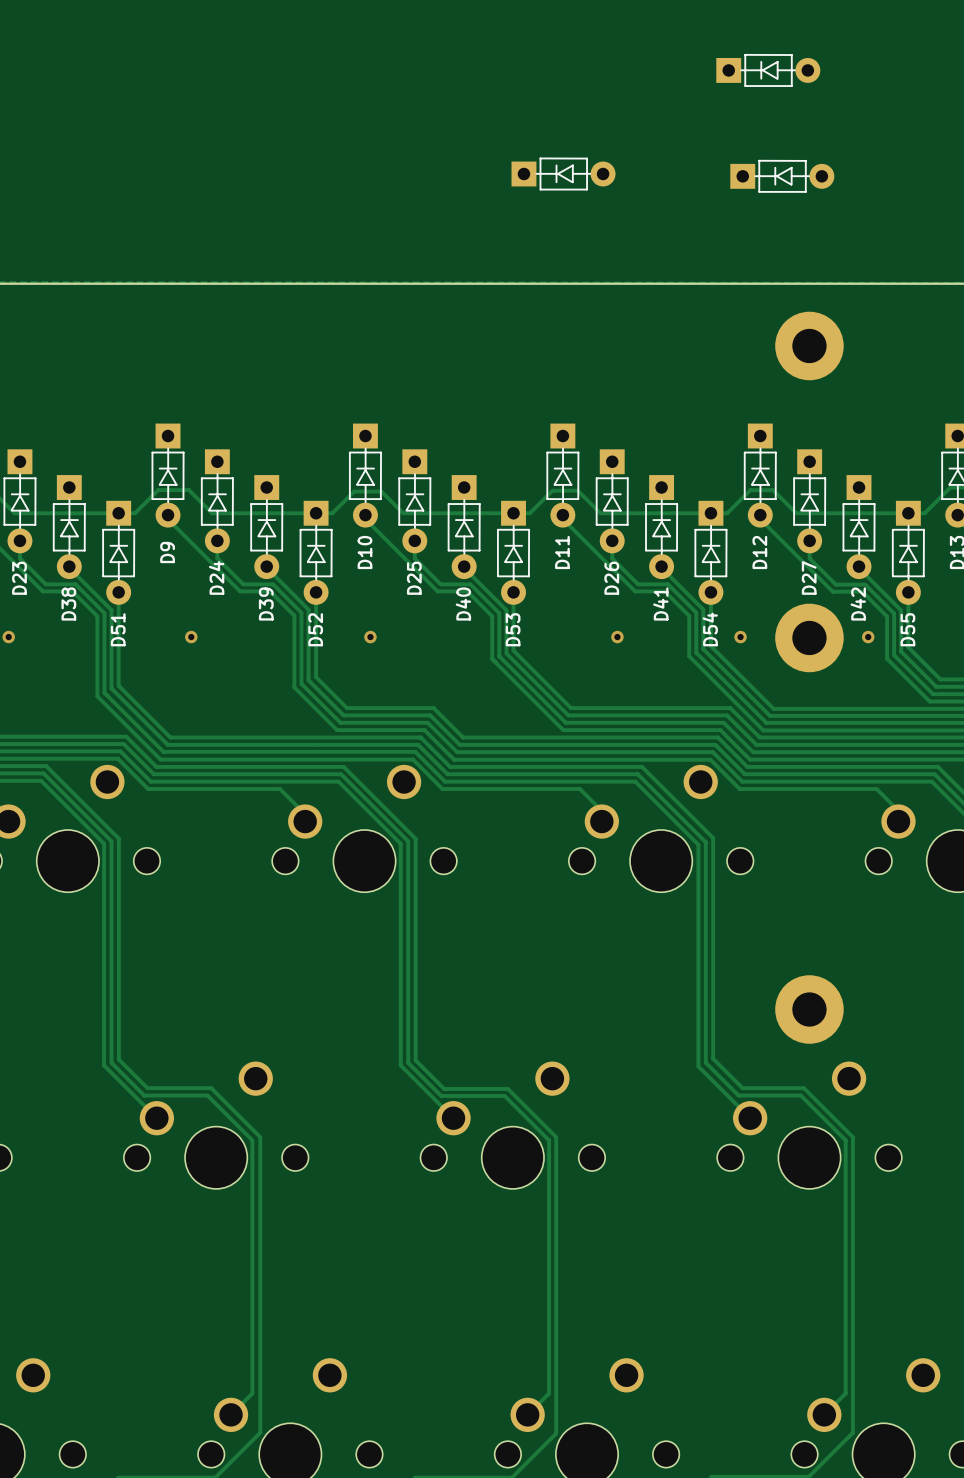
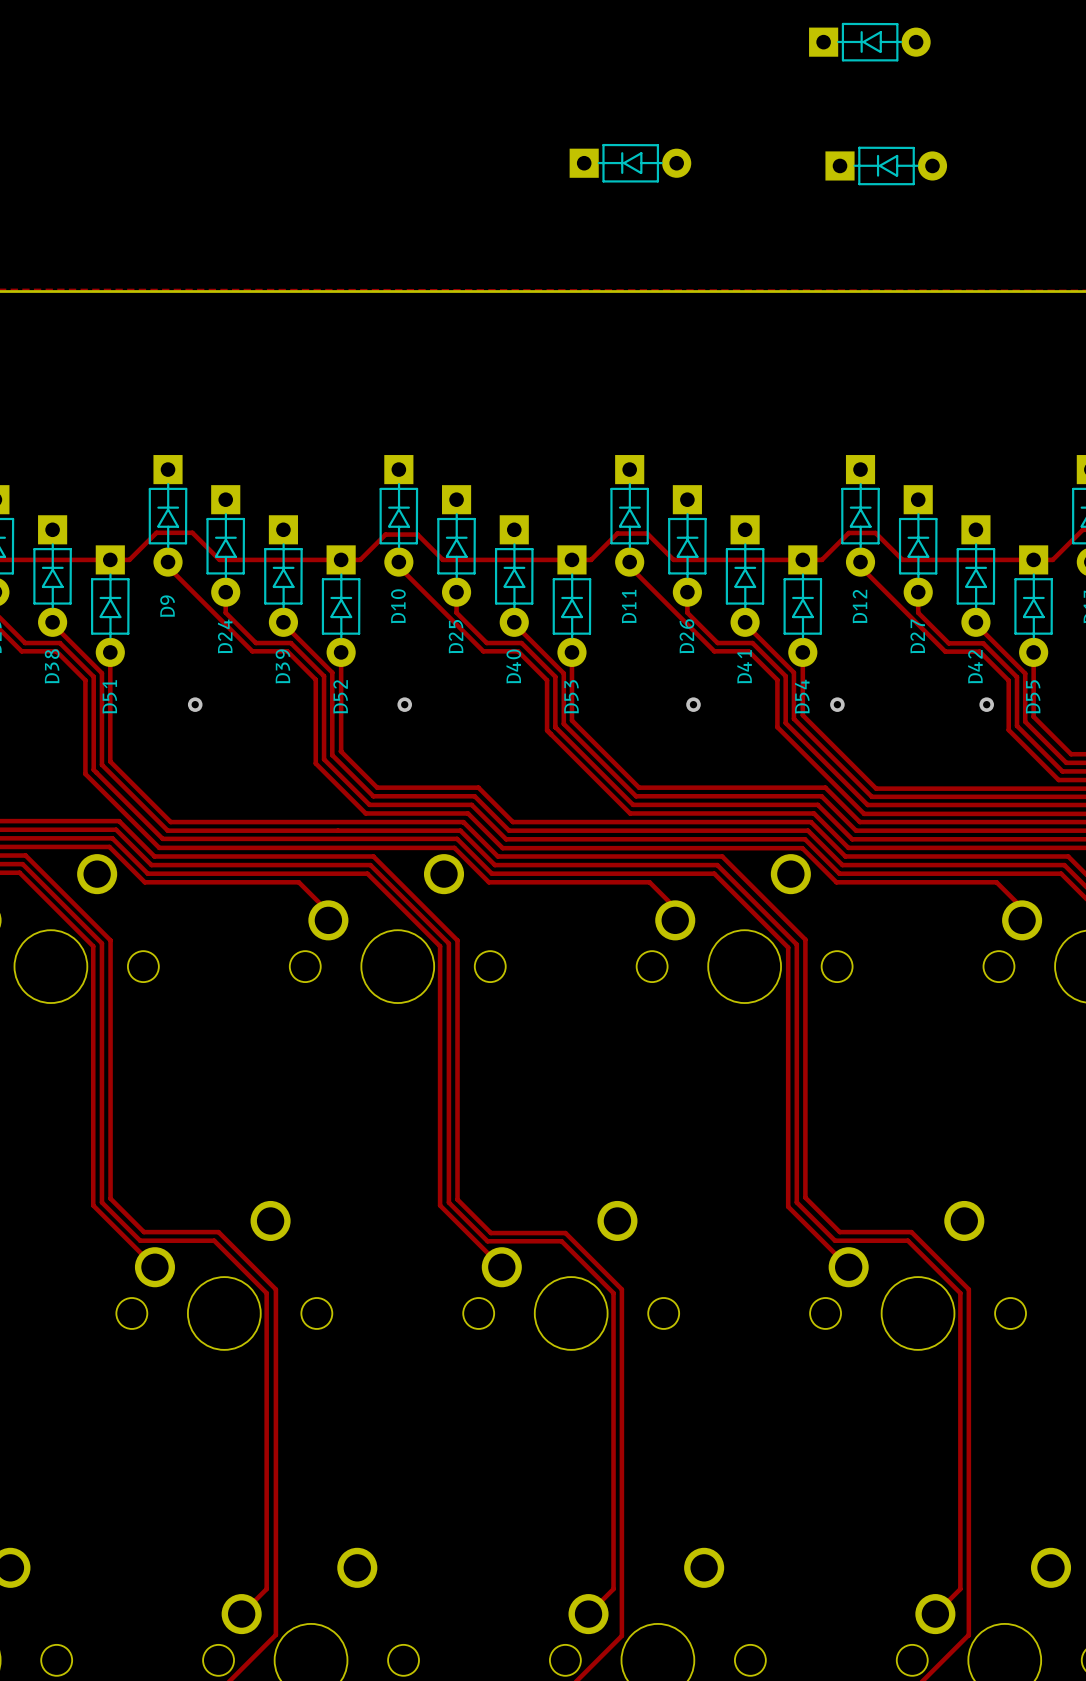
part: (809, 345) -> none
part: (809, 637) -> none
part: (809, 1009) -> none

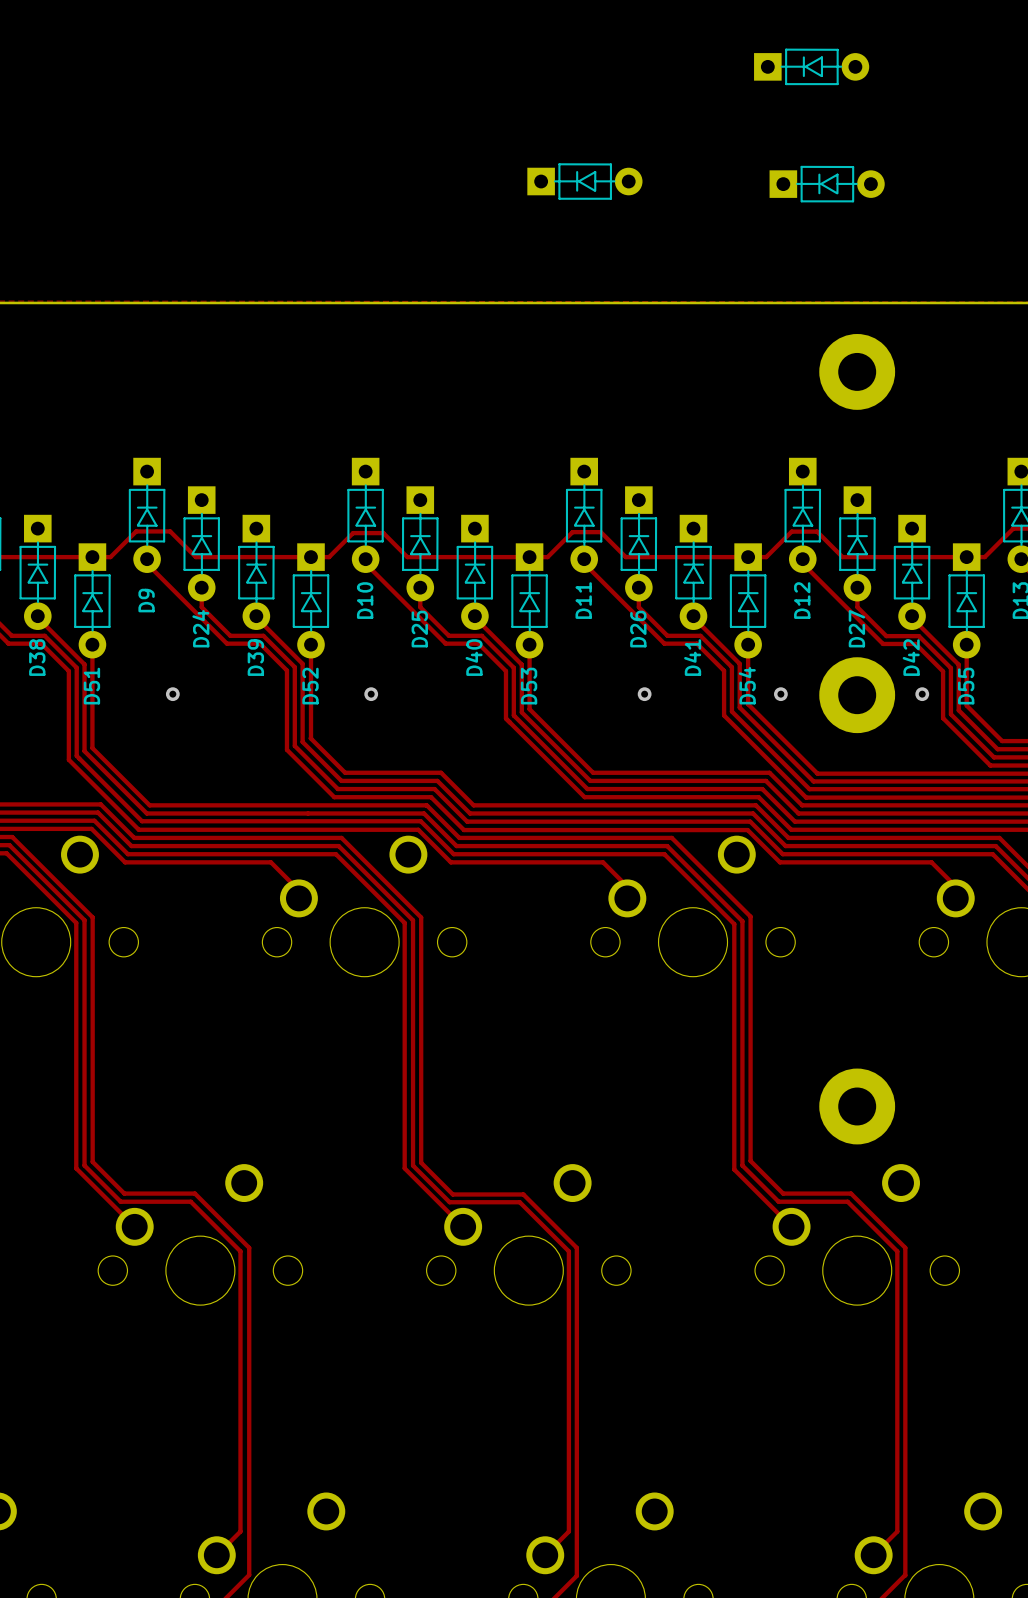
part: none -> (857, 371)
part: none -> (857, 695)
part: none -> (857, 1106)

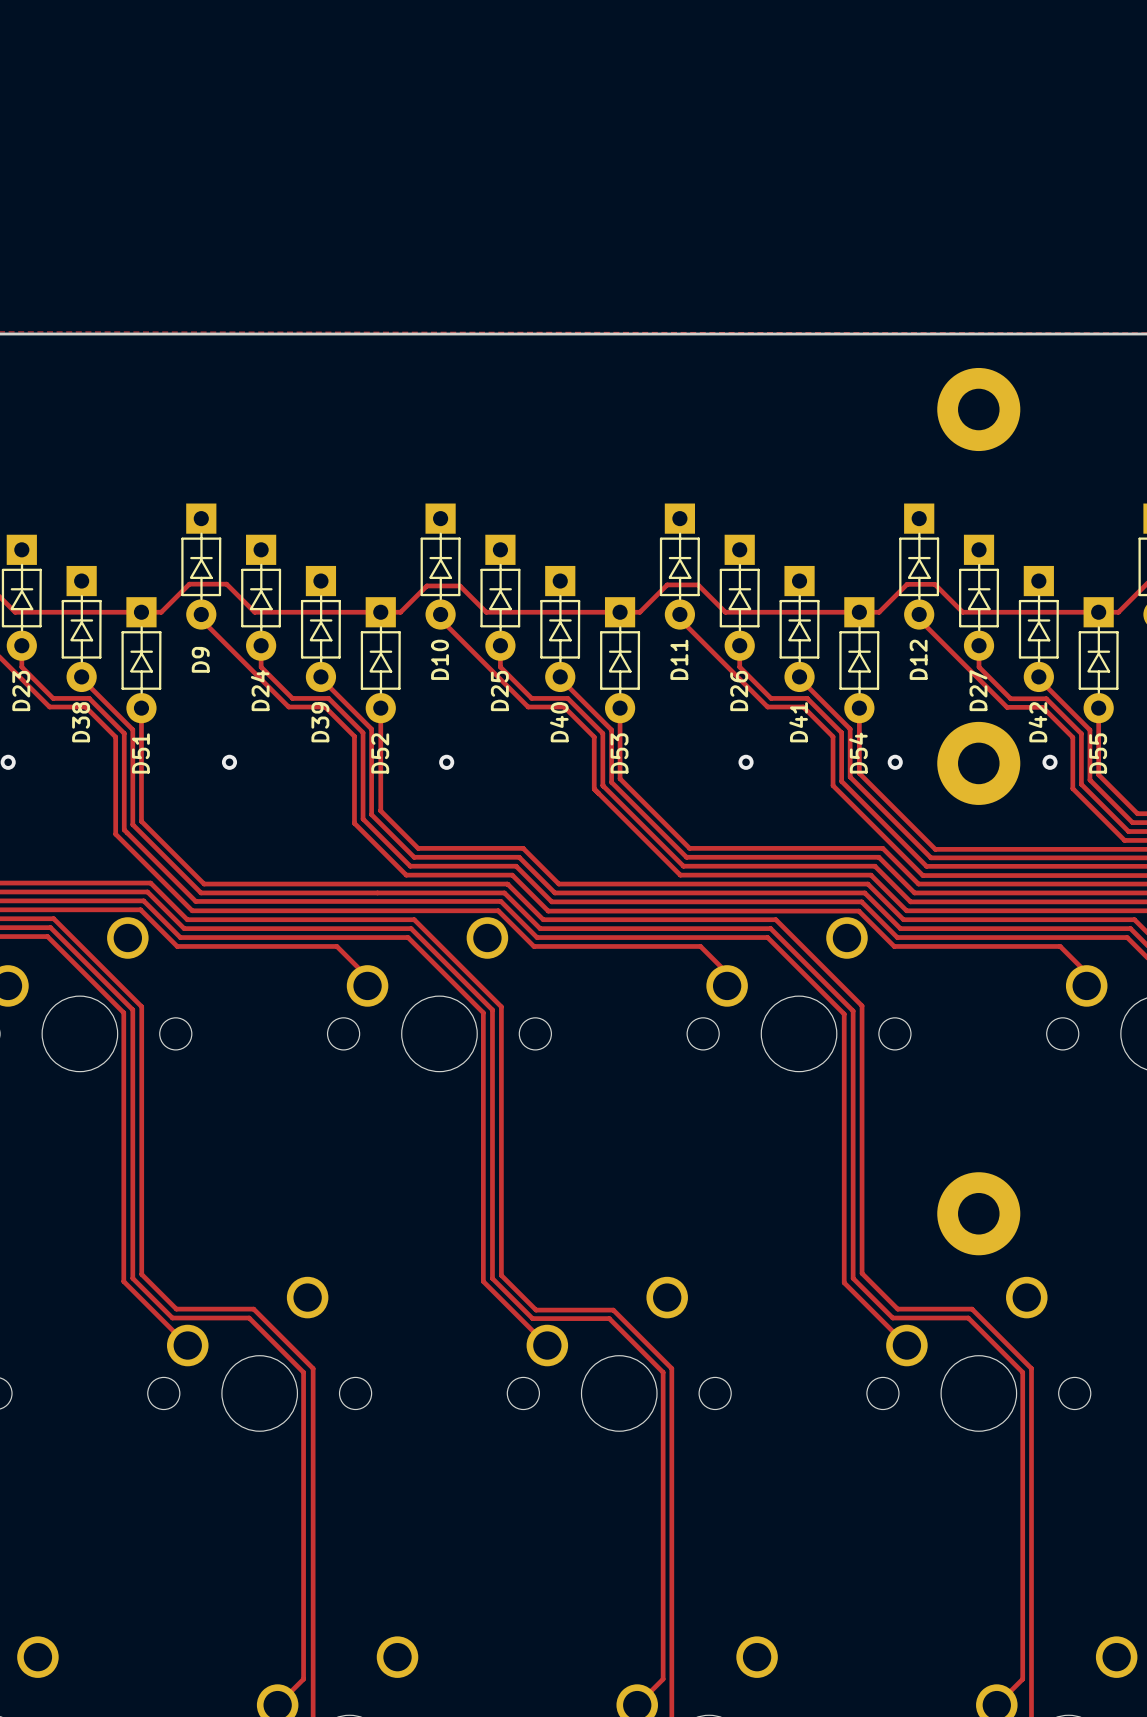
part: (811, 66) -> none
part: (584, 181) -> none
part: (827, 184) -> none

